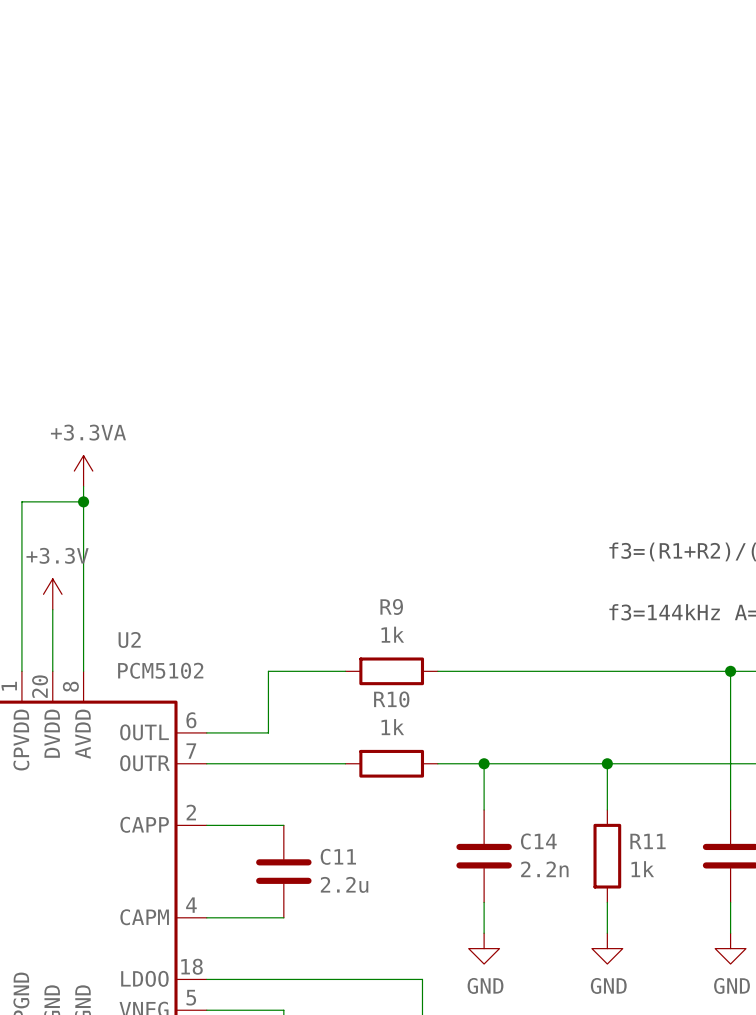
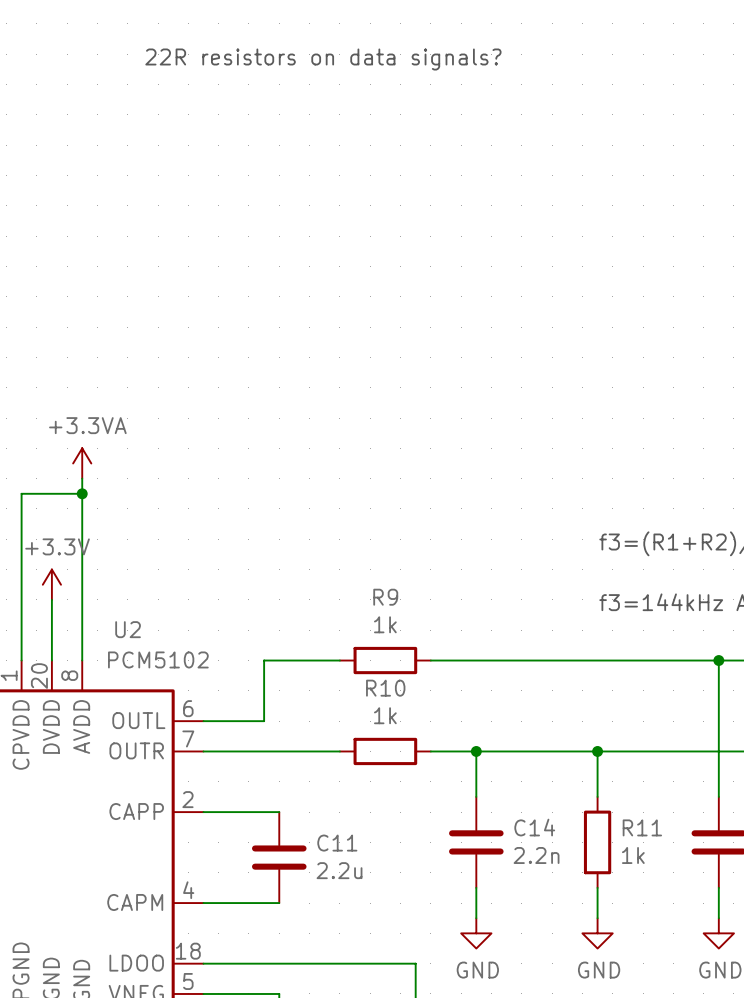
text: none -> 22R resistors on data signals? (323, 59)

